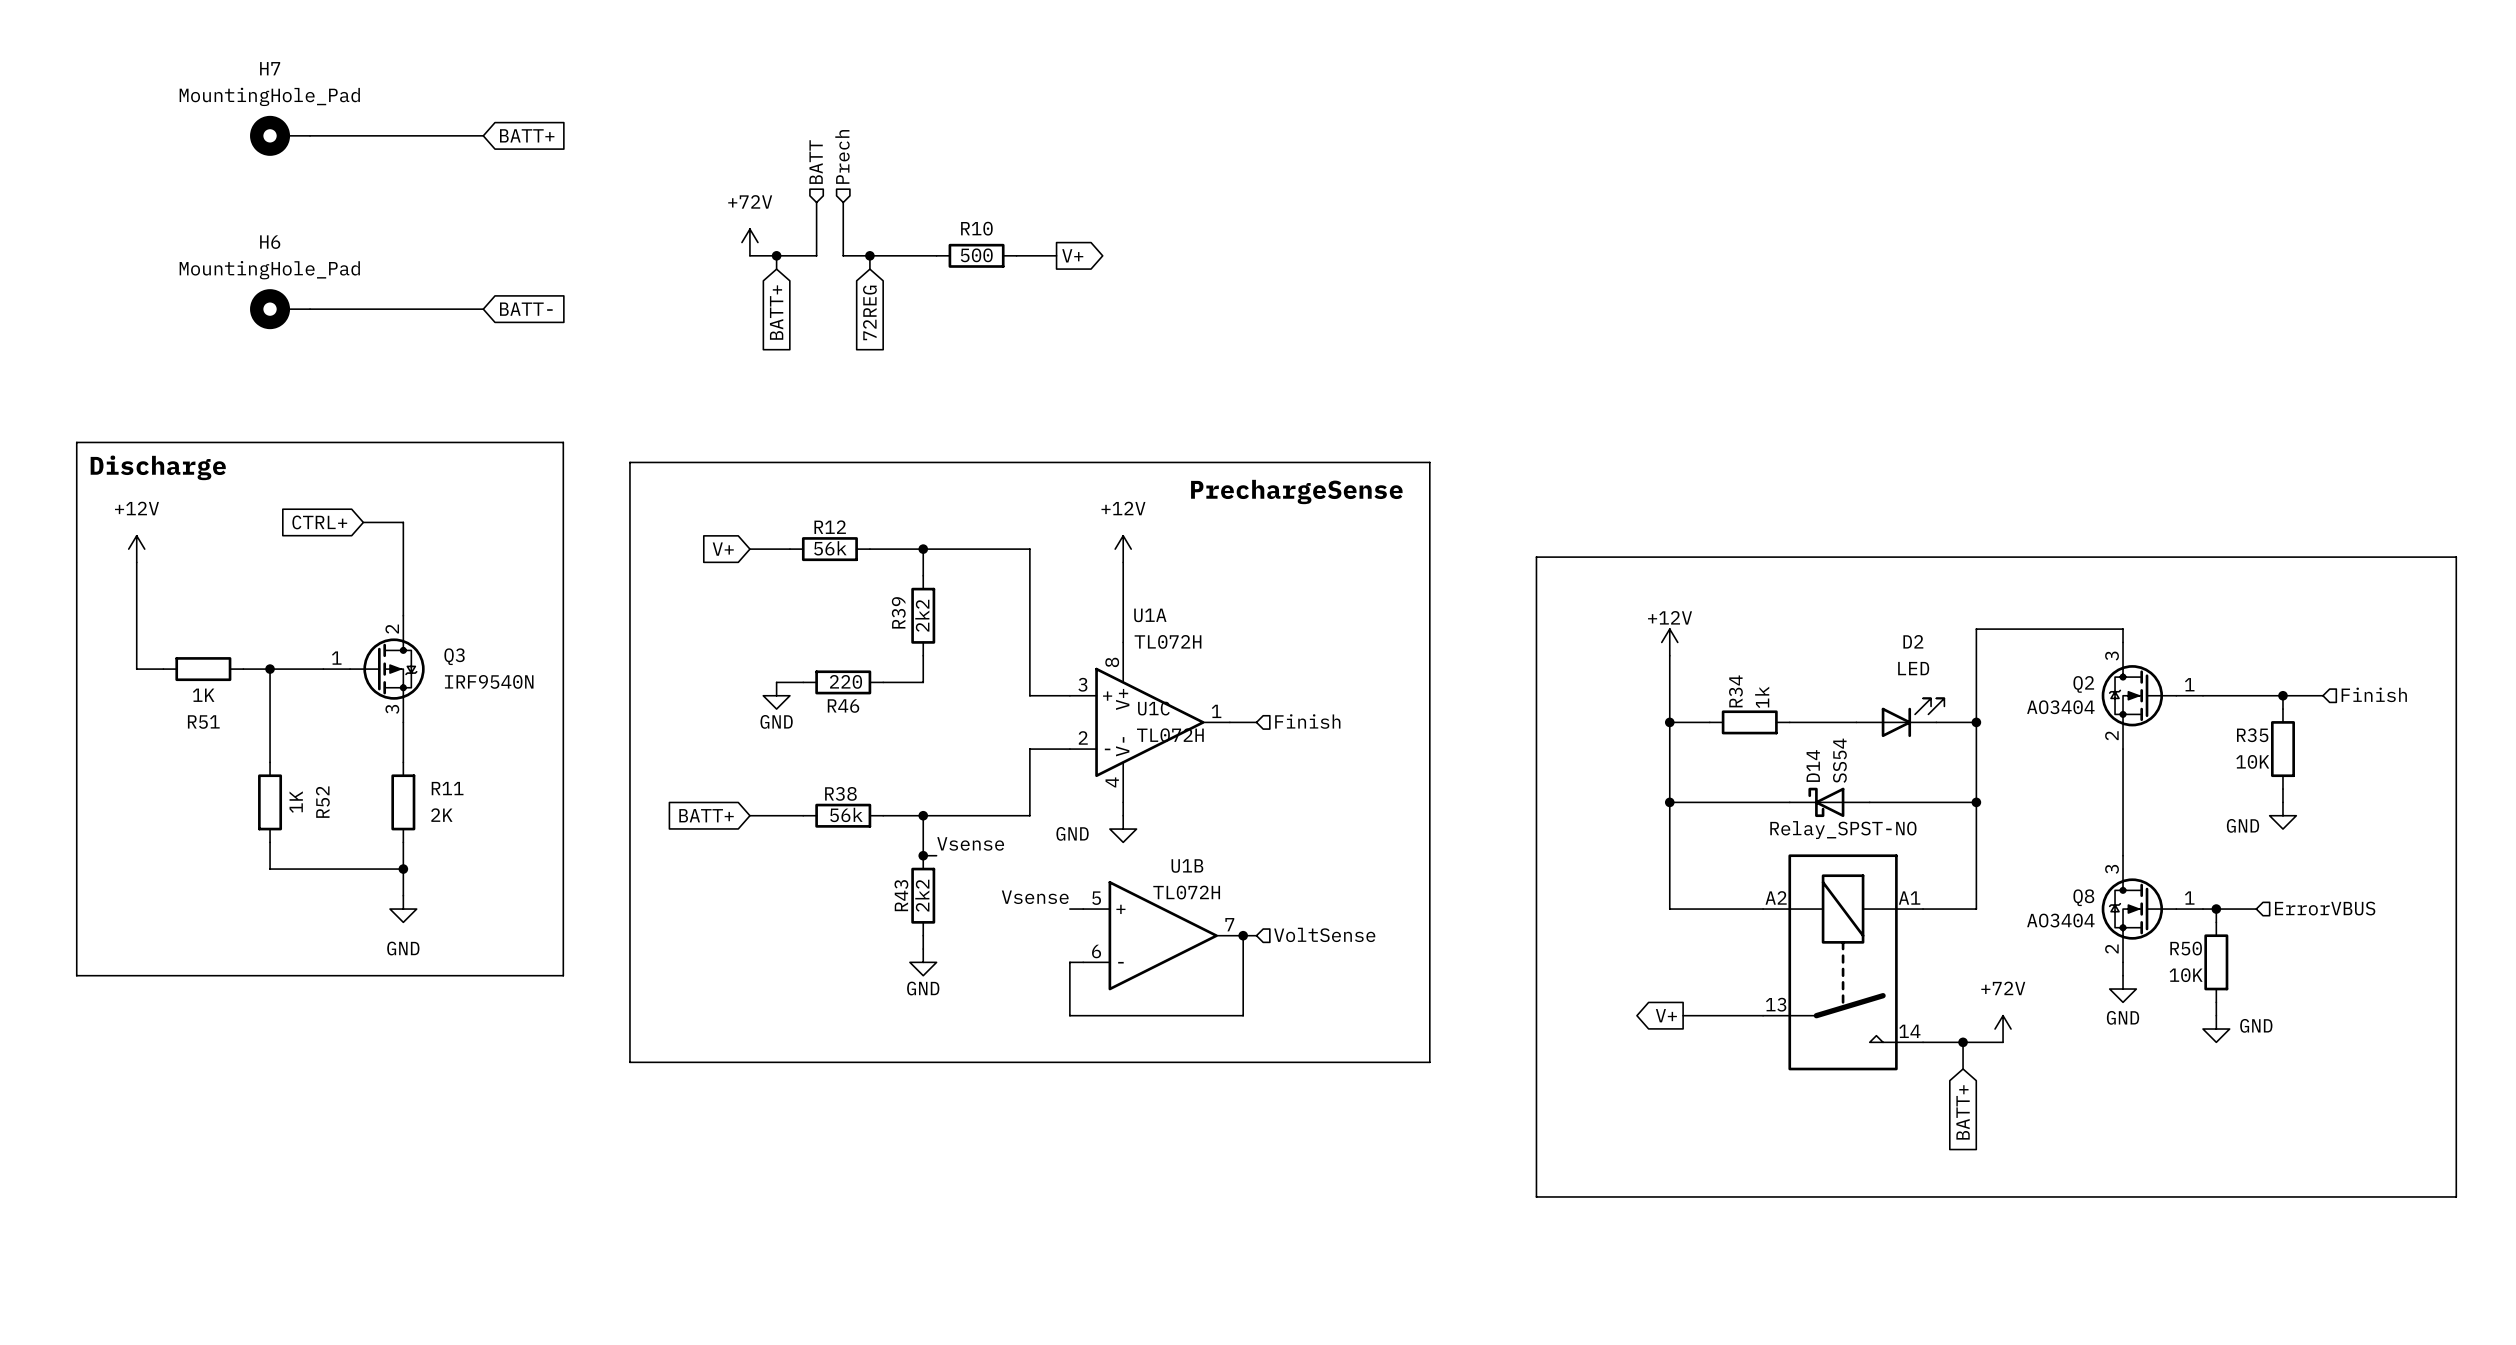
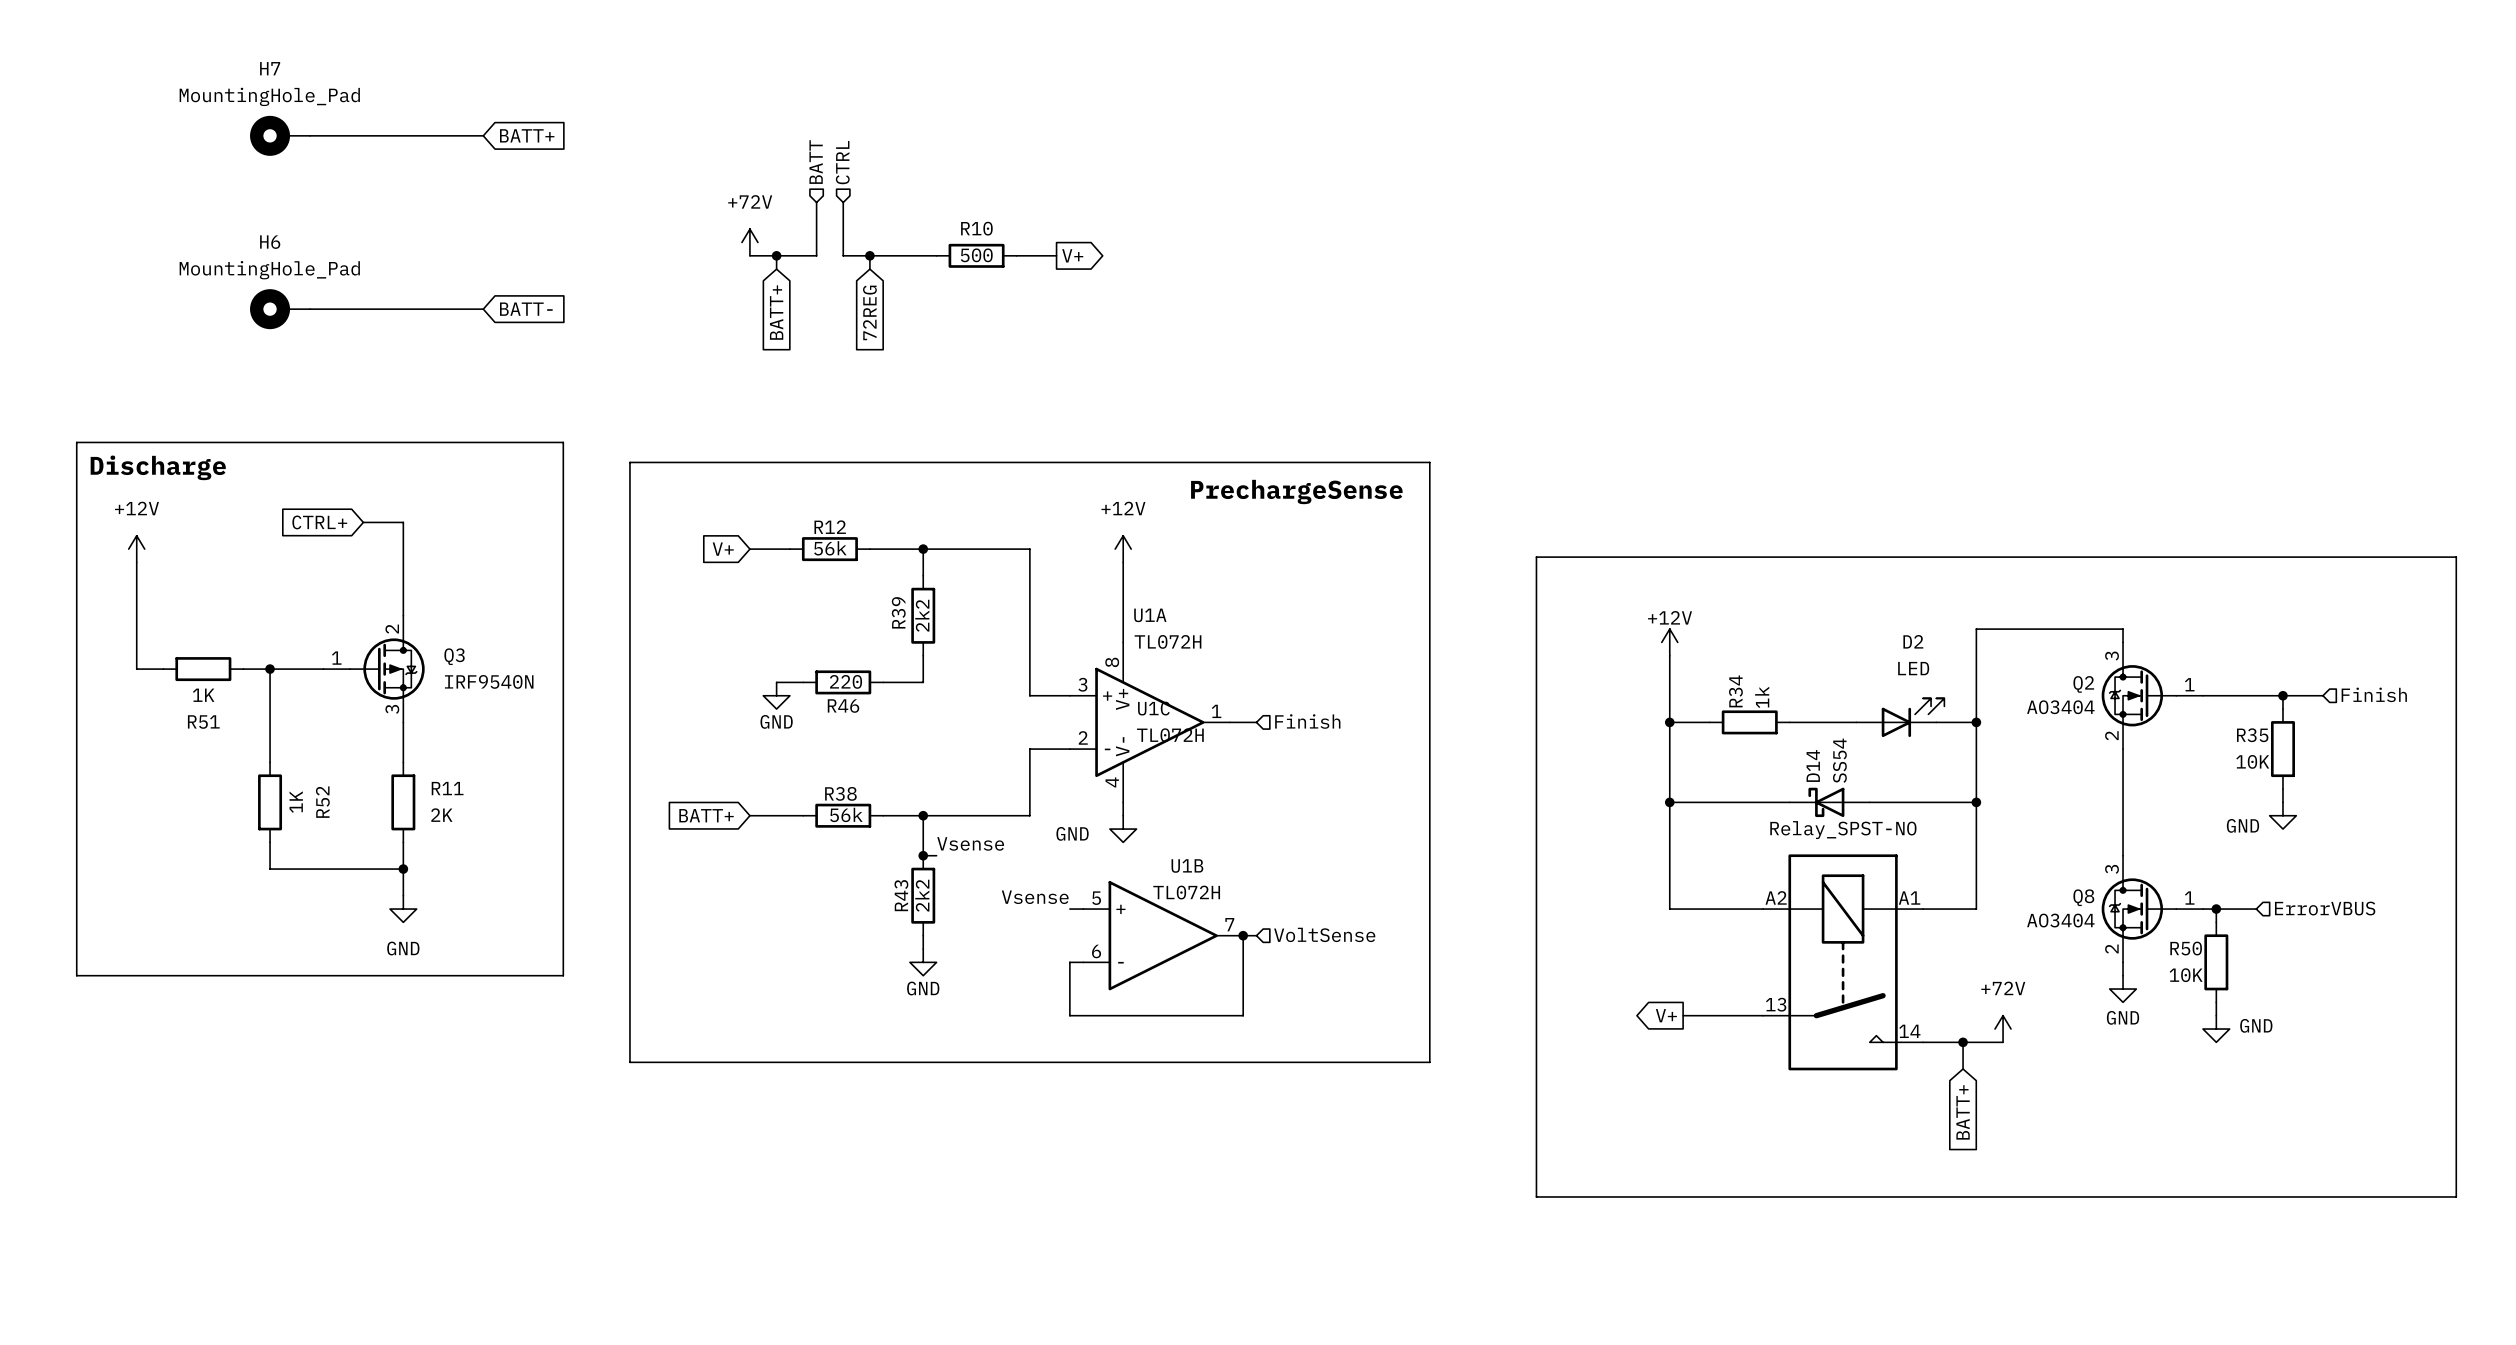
hierarchical label: Prech (842, 156) -> CTRL (842, 162)

